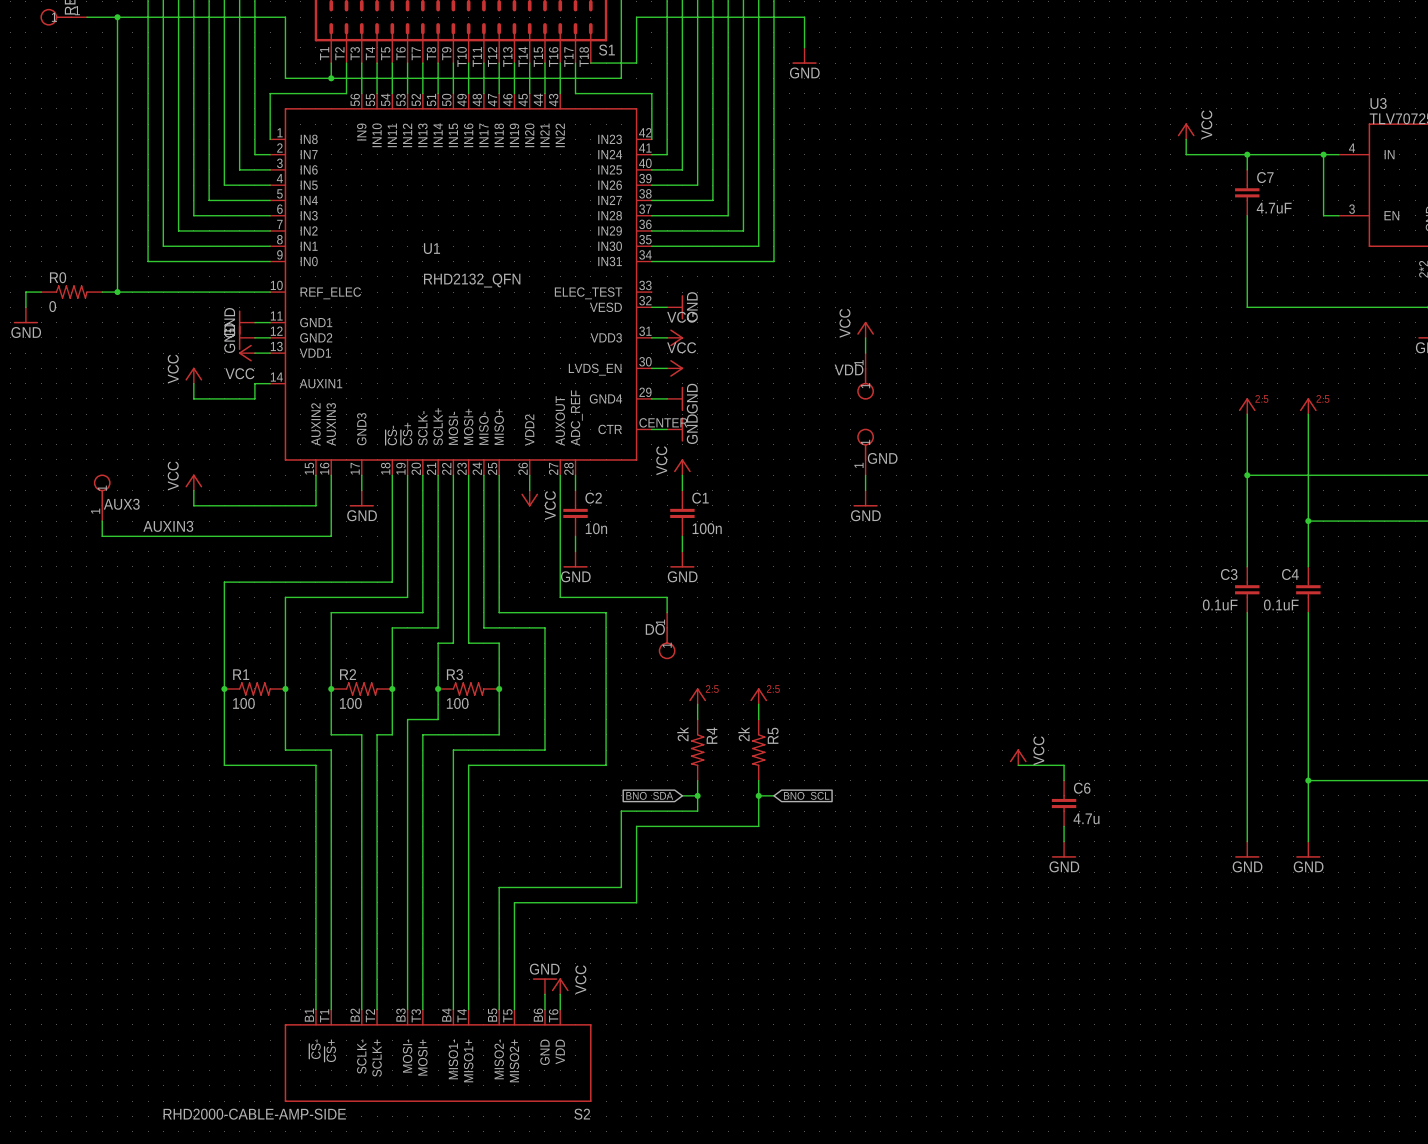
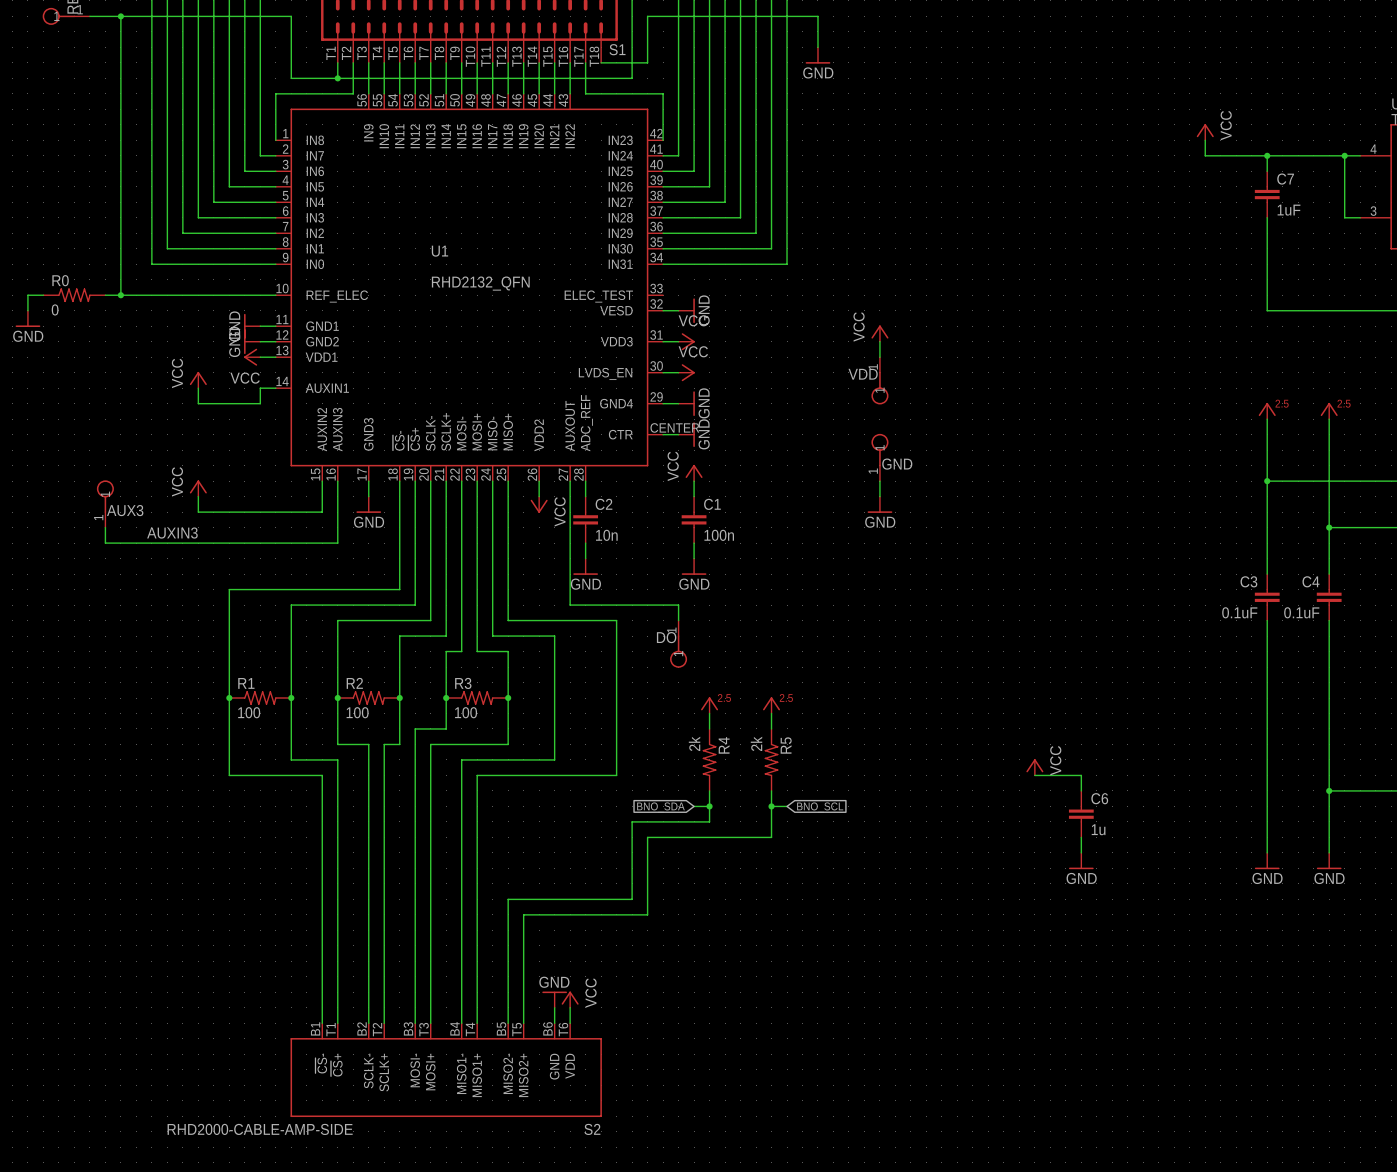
C7 value: 4.7uF (1274, 208) -> 1uF (1289, 210)
C6 value: 4.7u (1086, 818) -> 1u (1098, 829)

